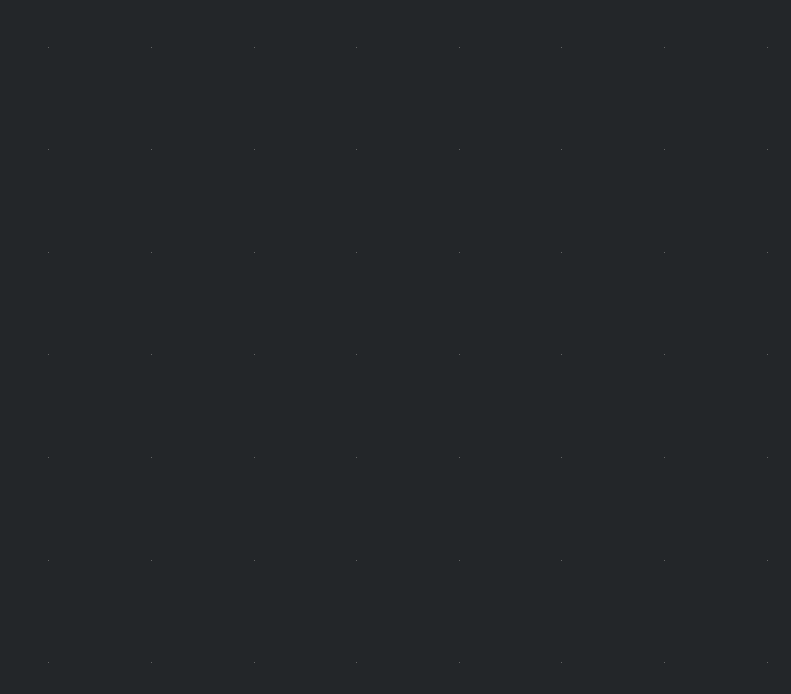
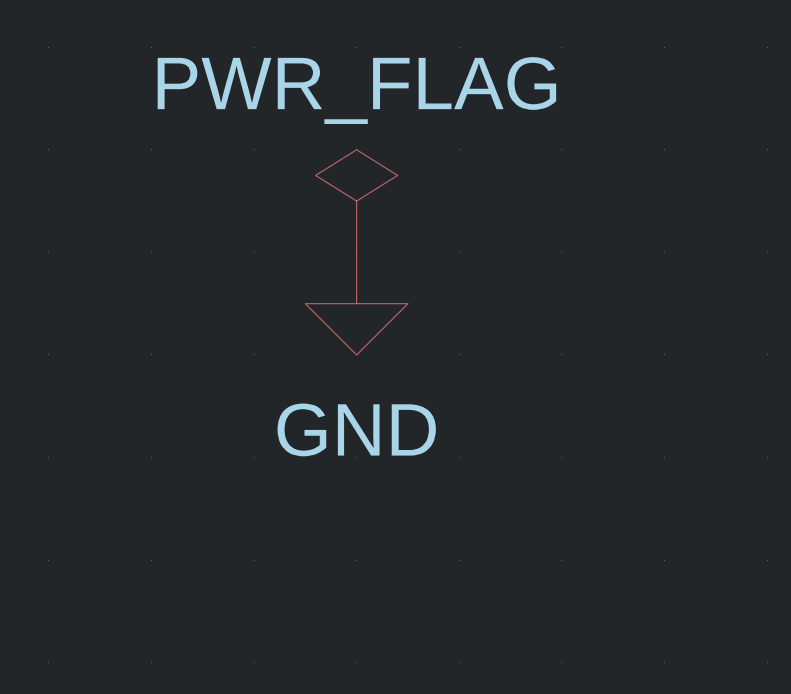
power symbol: none -> PWR_FLAG (356, 201)
power symbol: none -> GND (356, 303)

